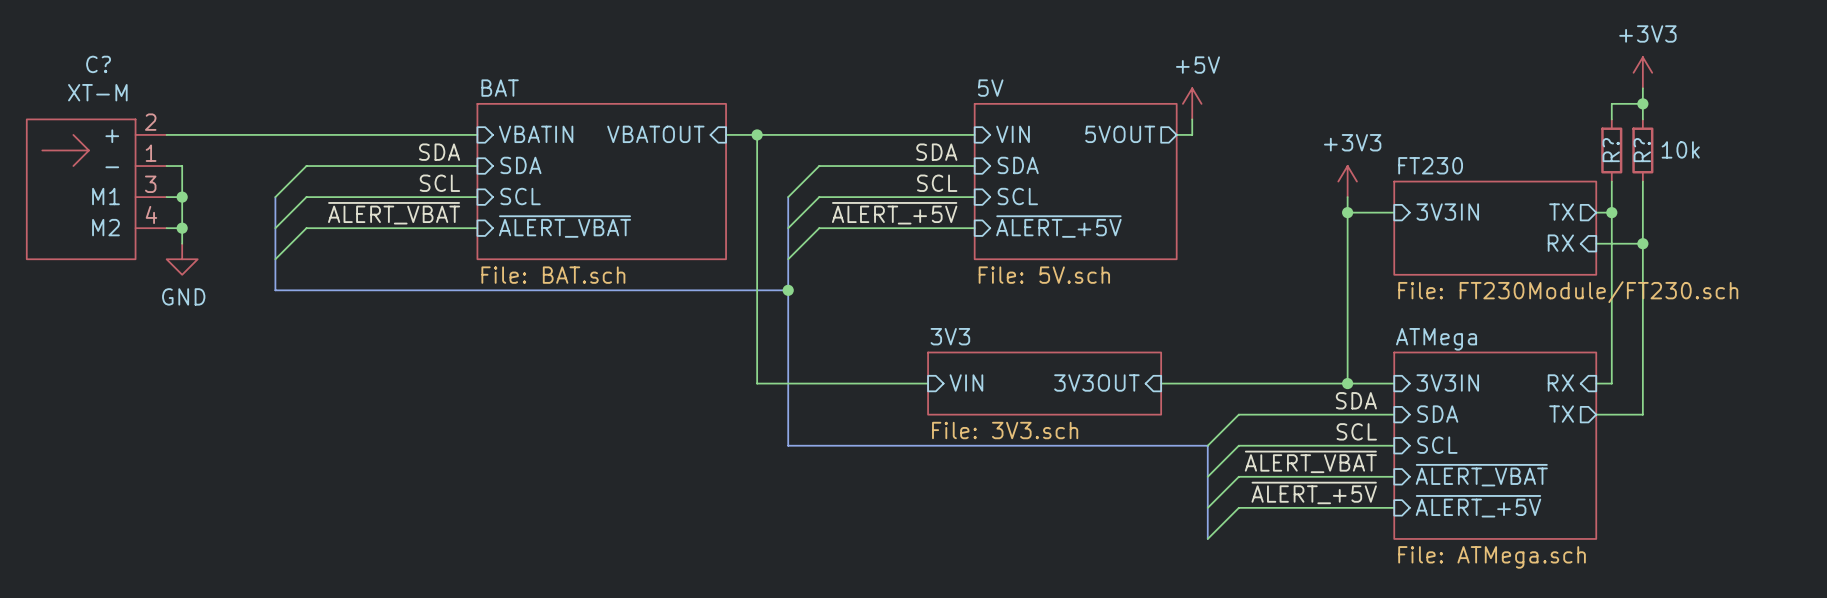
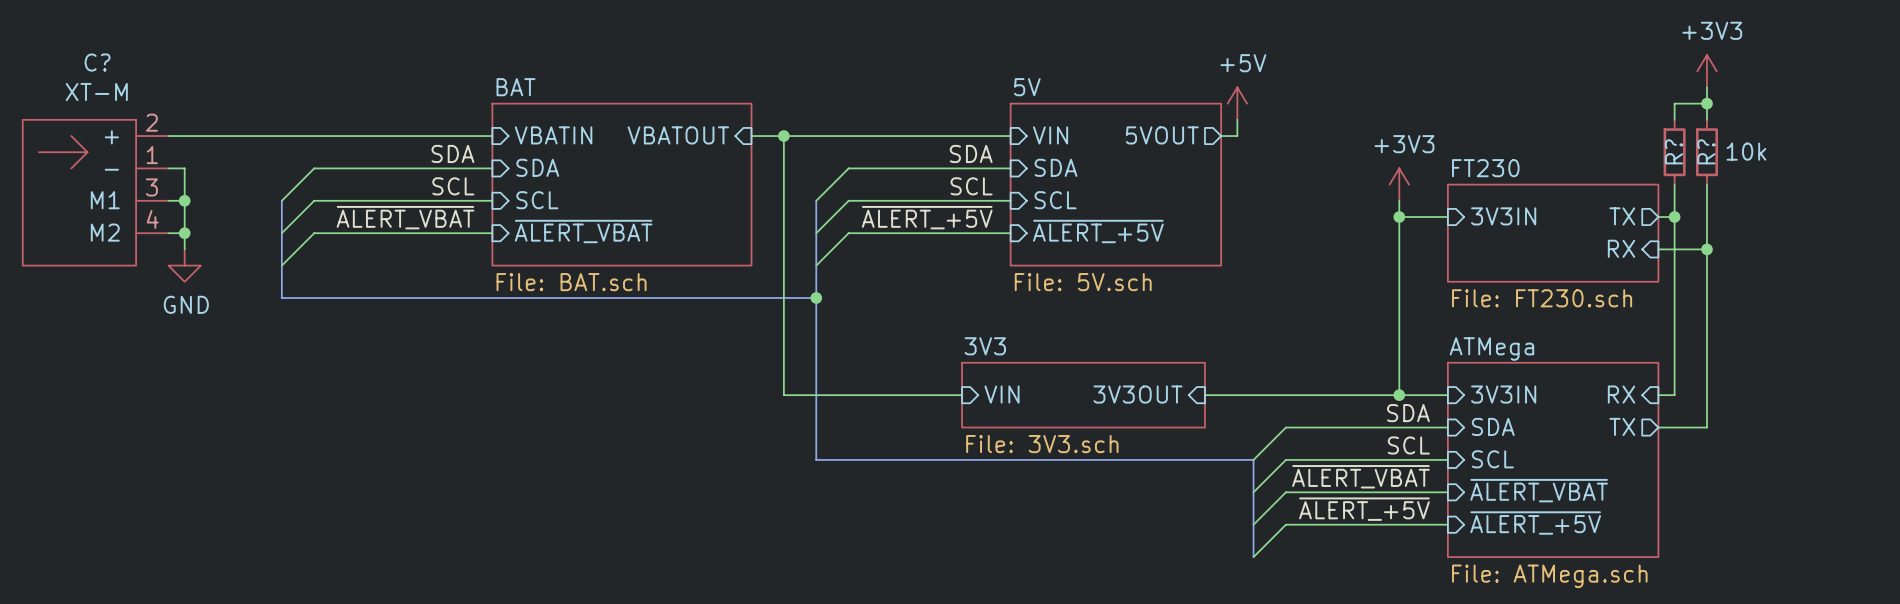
sheet FT230 value: File: FT230Module/FT230.sch (1568, 292) -> File: FT230.sch (1542, 298)

